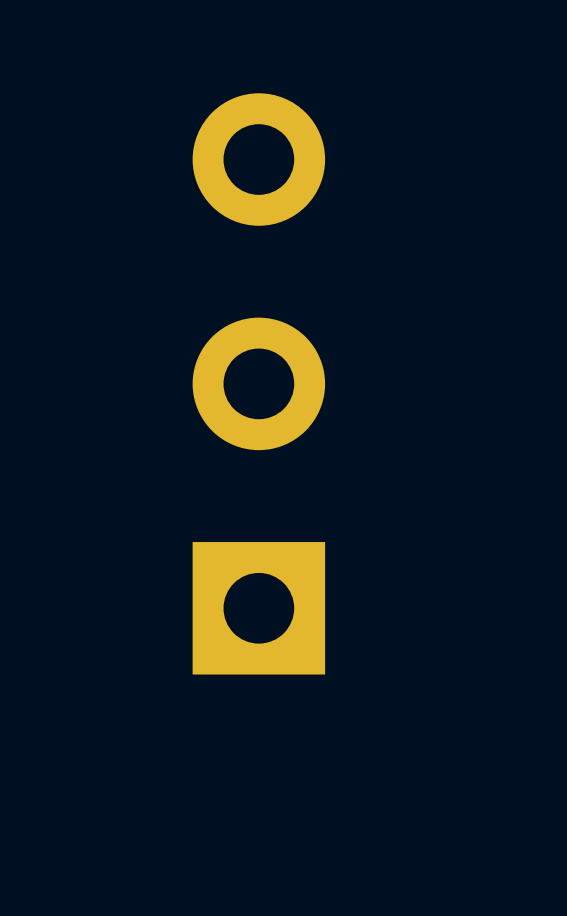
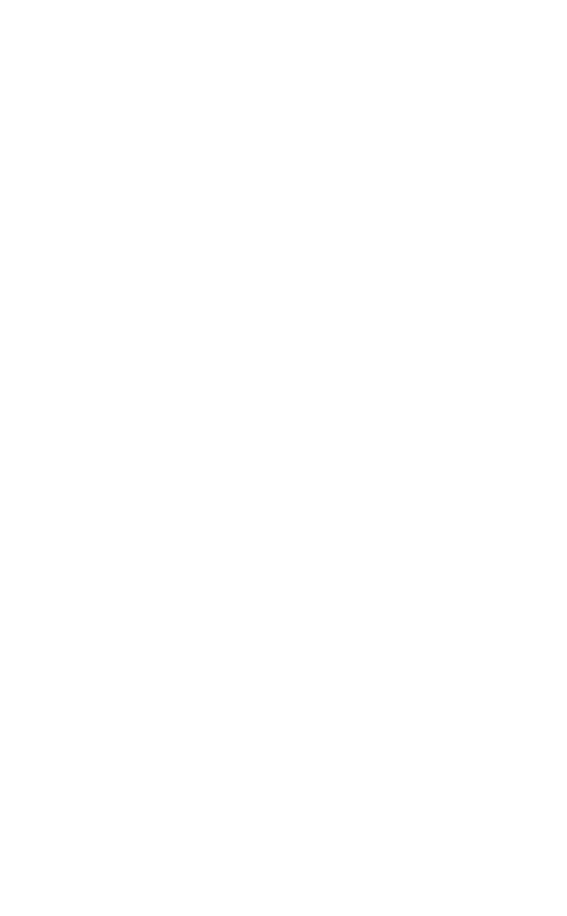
part: (258, 383) -> none

